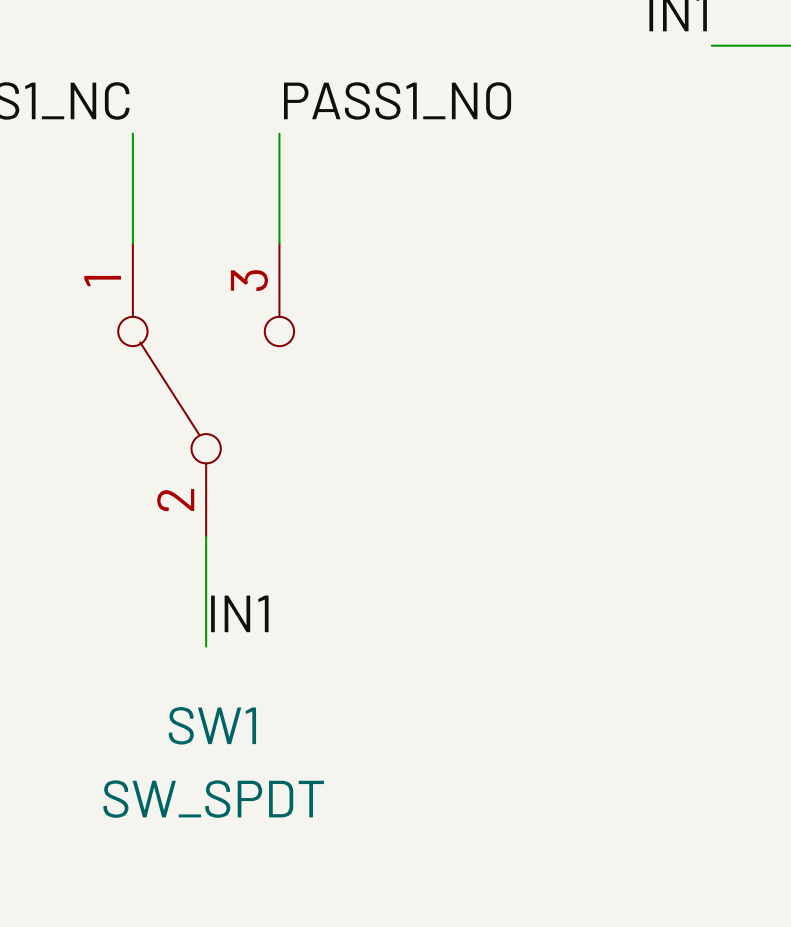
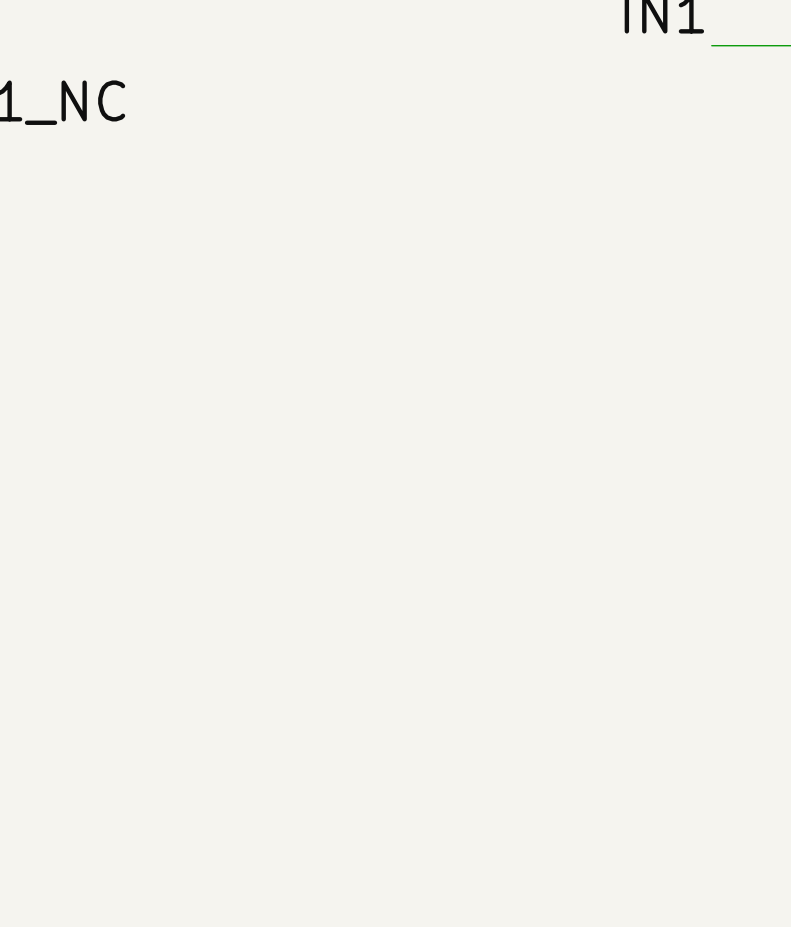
label: PASS1_NO (397, 100) -> none
wire: (132, 133) (132, 243) -> none
wire: (279, 133) (279, 243) -> none
SW1: SW_SPDT (206, 390) -> none
wire: (206, 536) (206, 646) -> none
label: IN1 (239, 613) -> none

